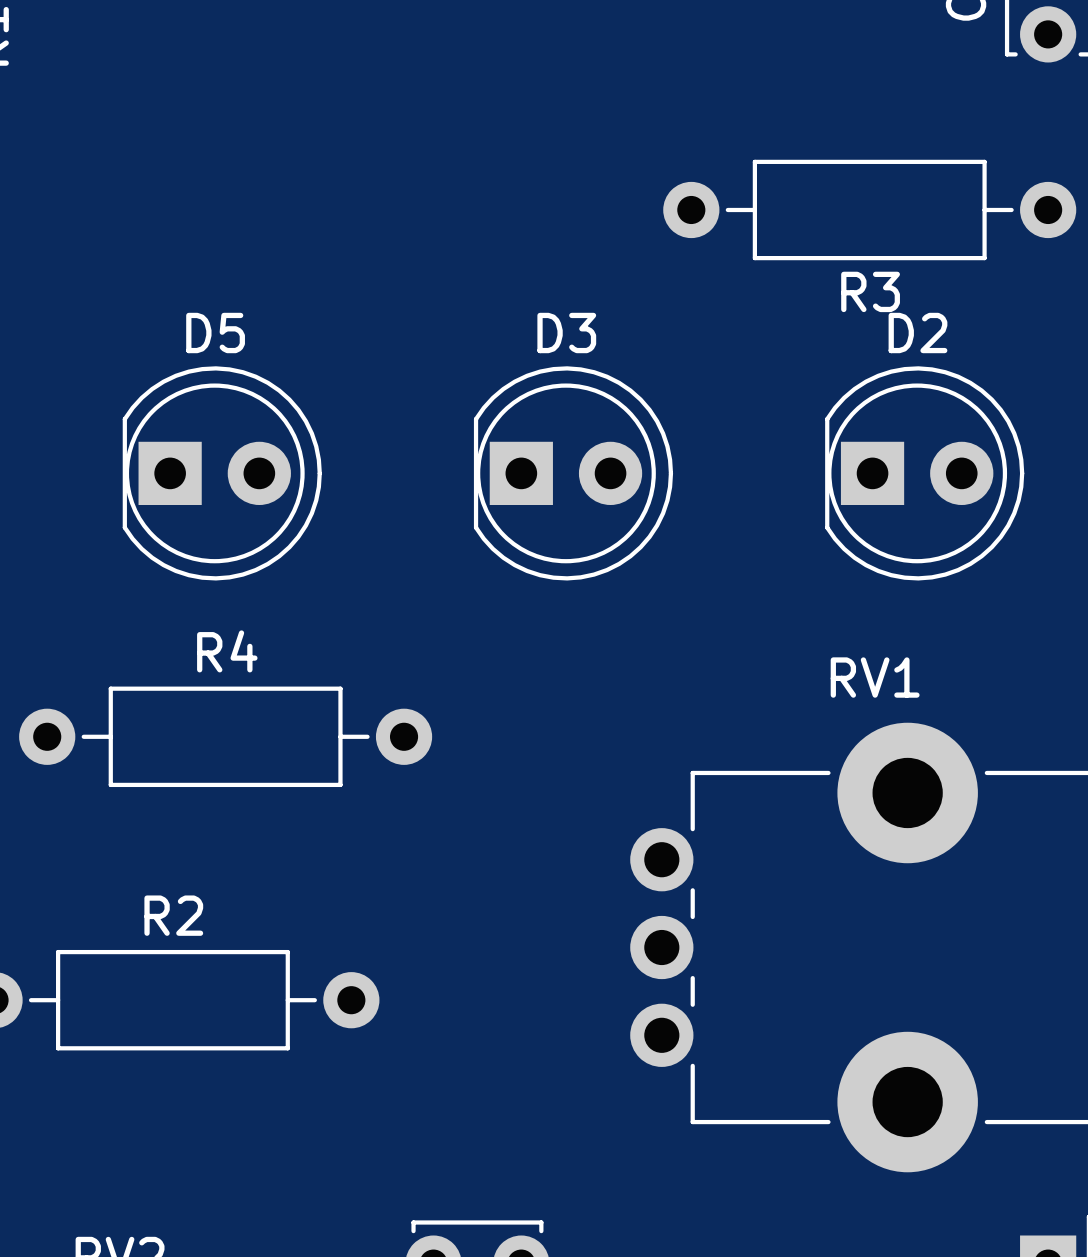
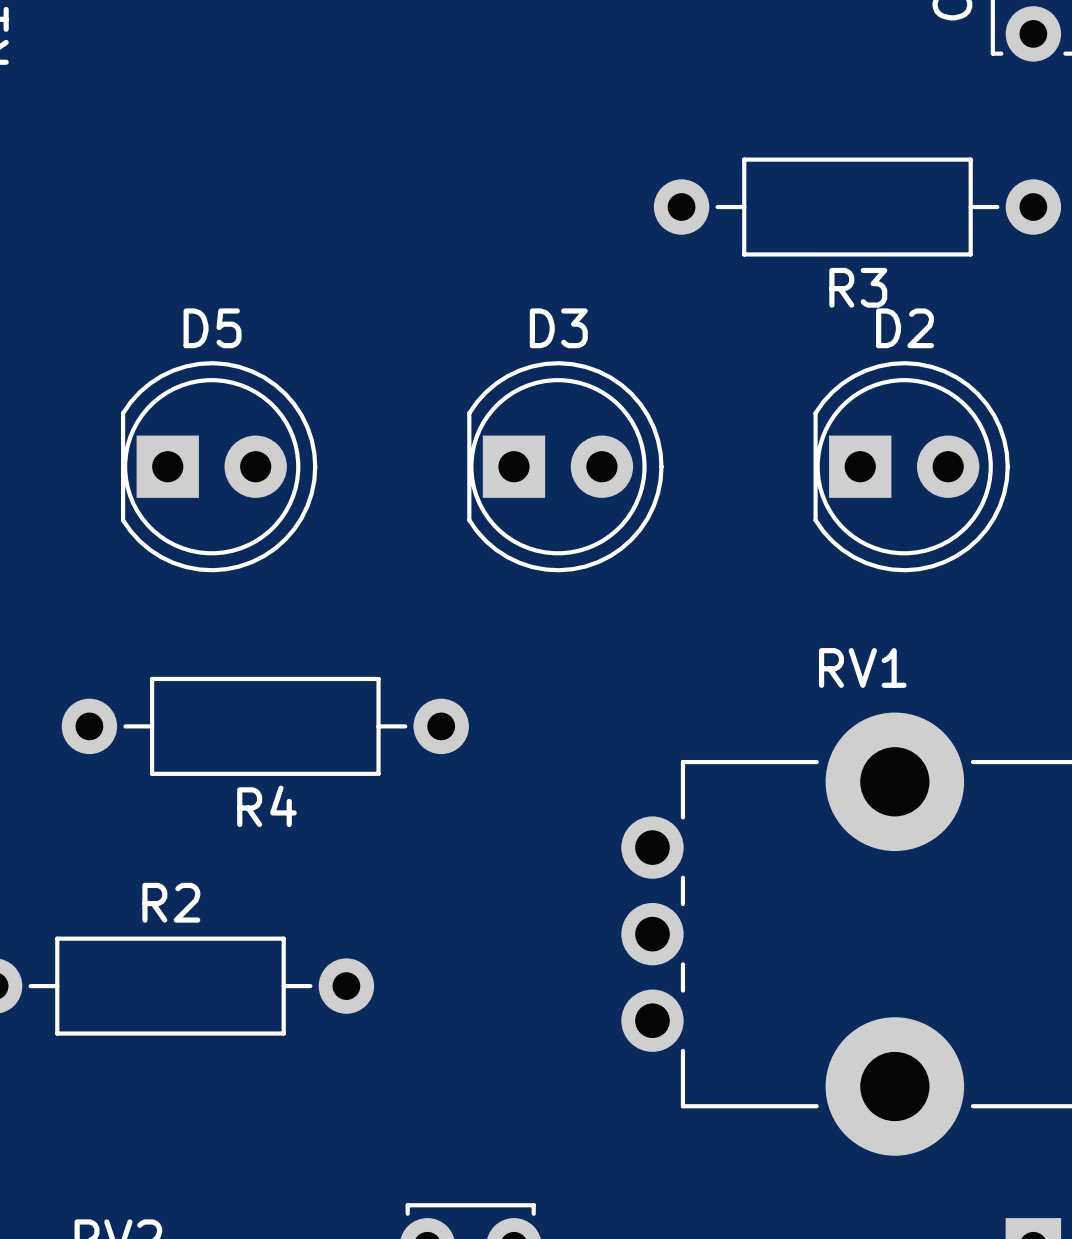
R4 name position: R4 (227, 651) -> R4 (266, 806)
R4 position: (225, 736) -> (265, 726)

